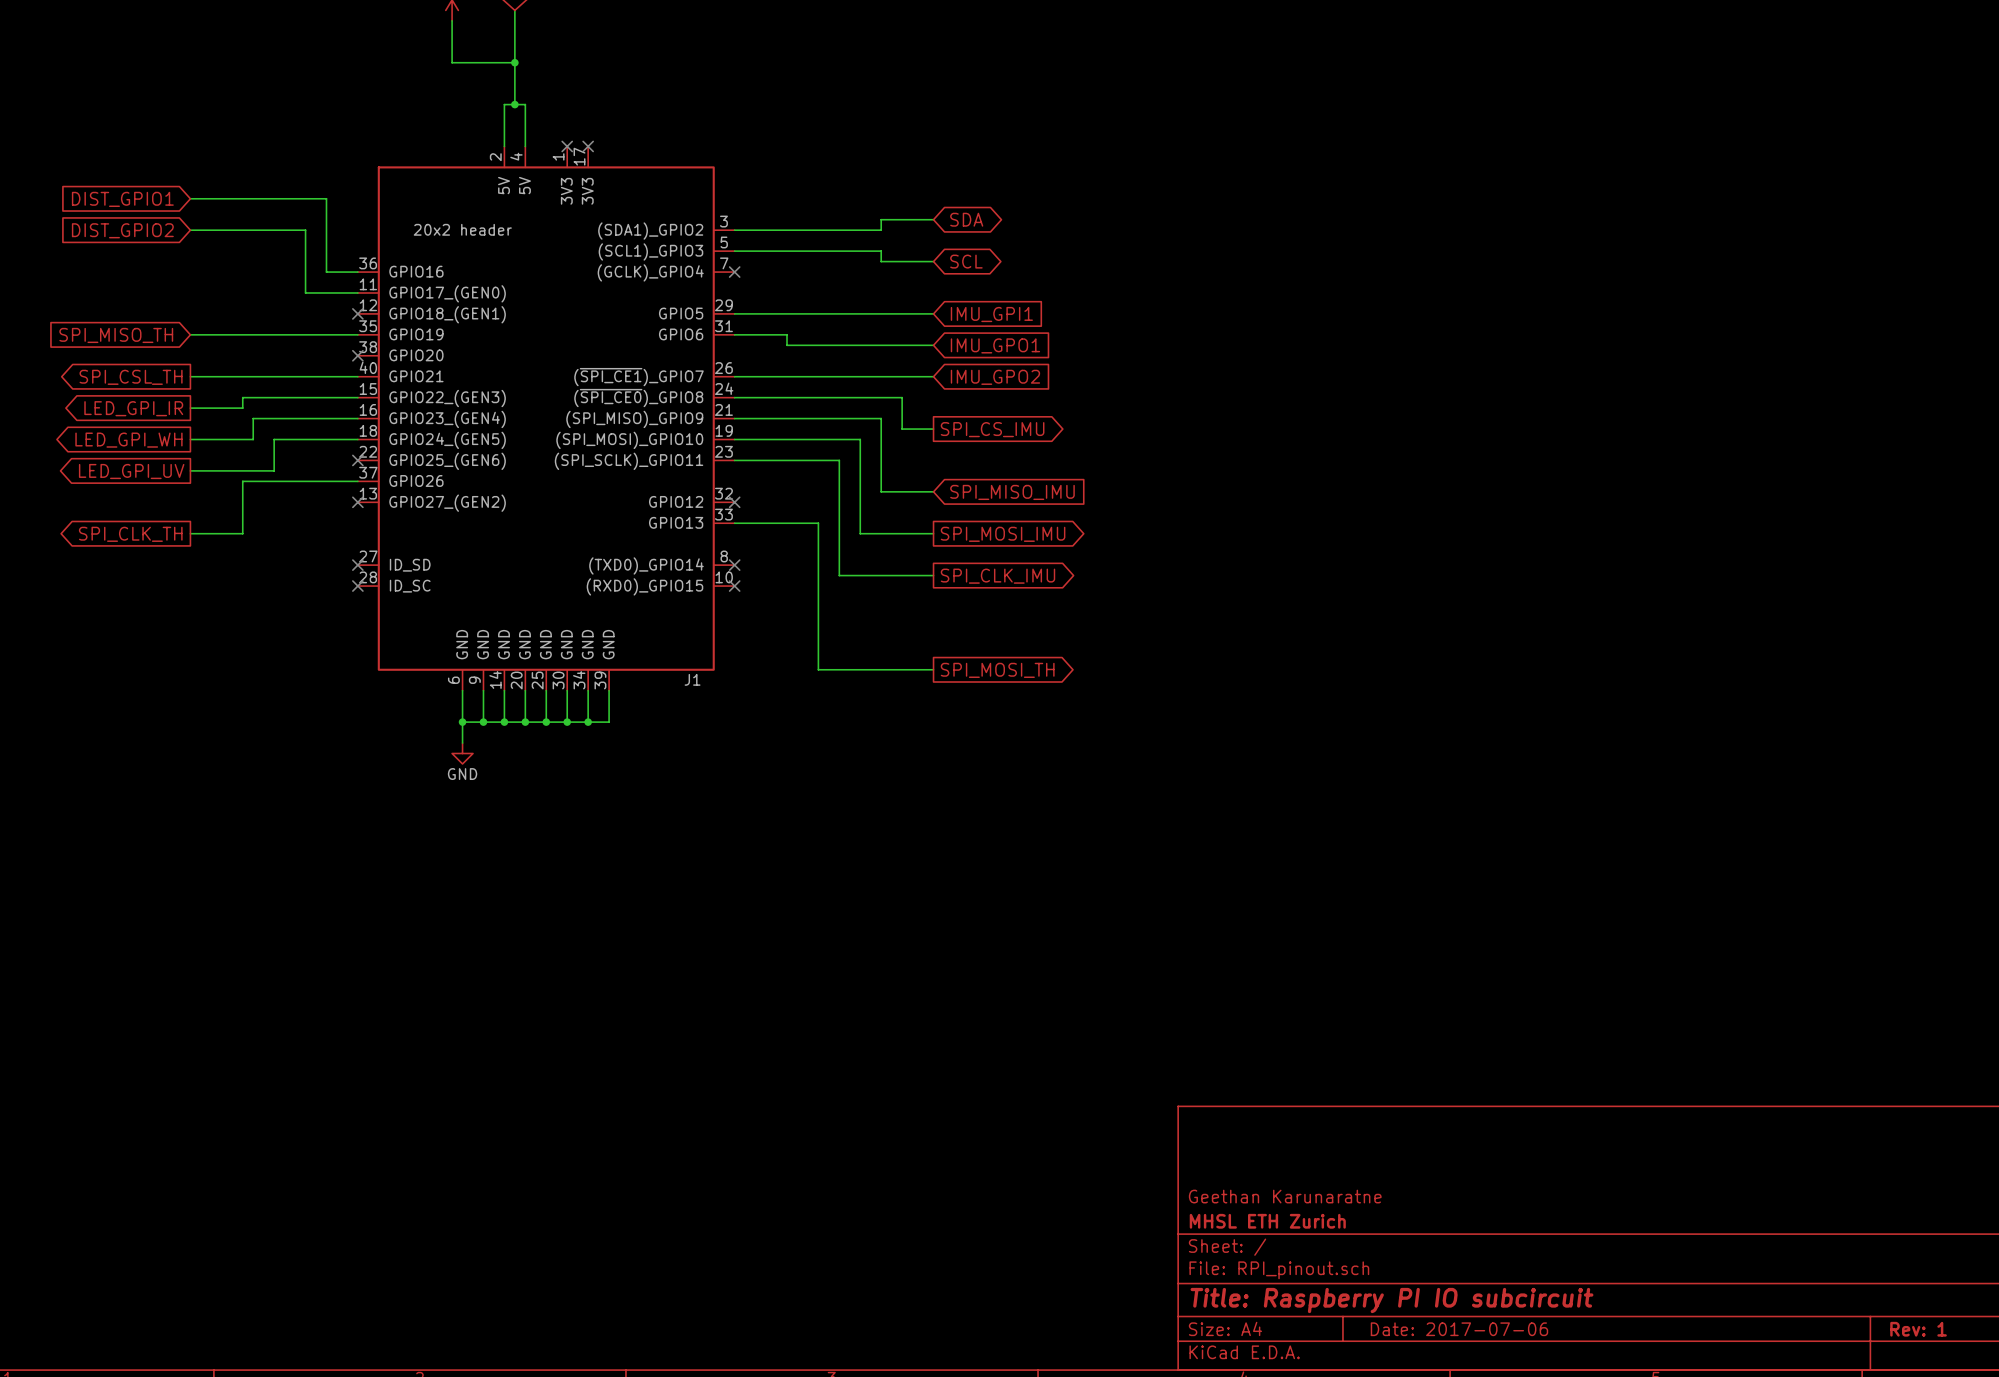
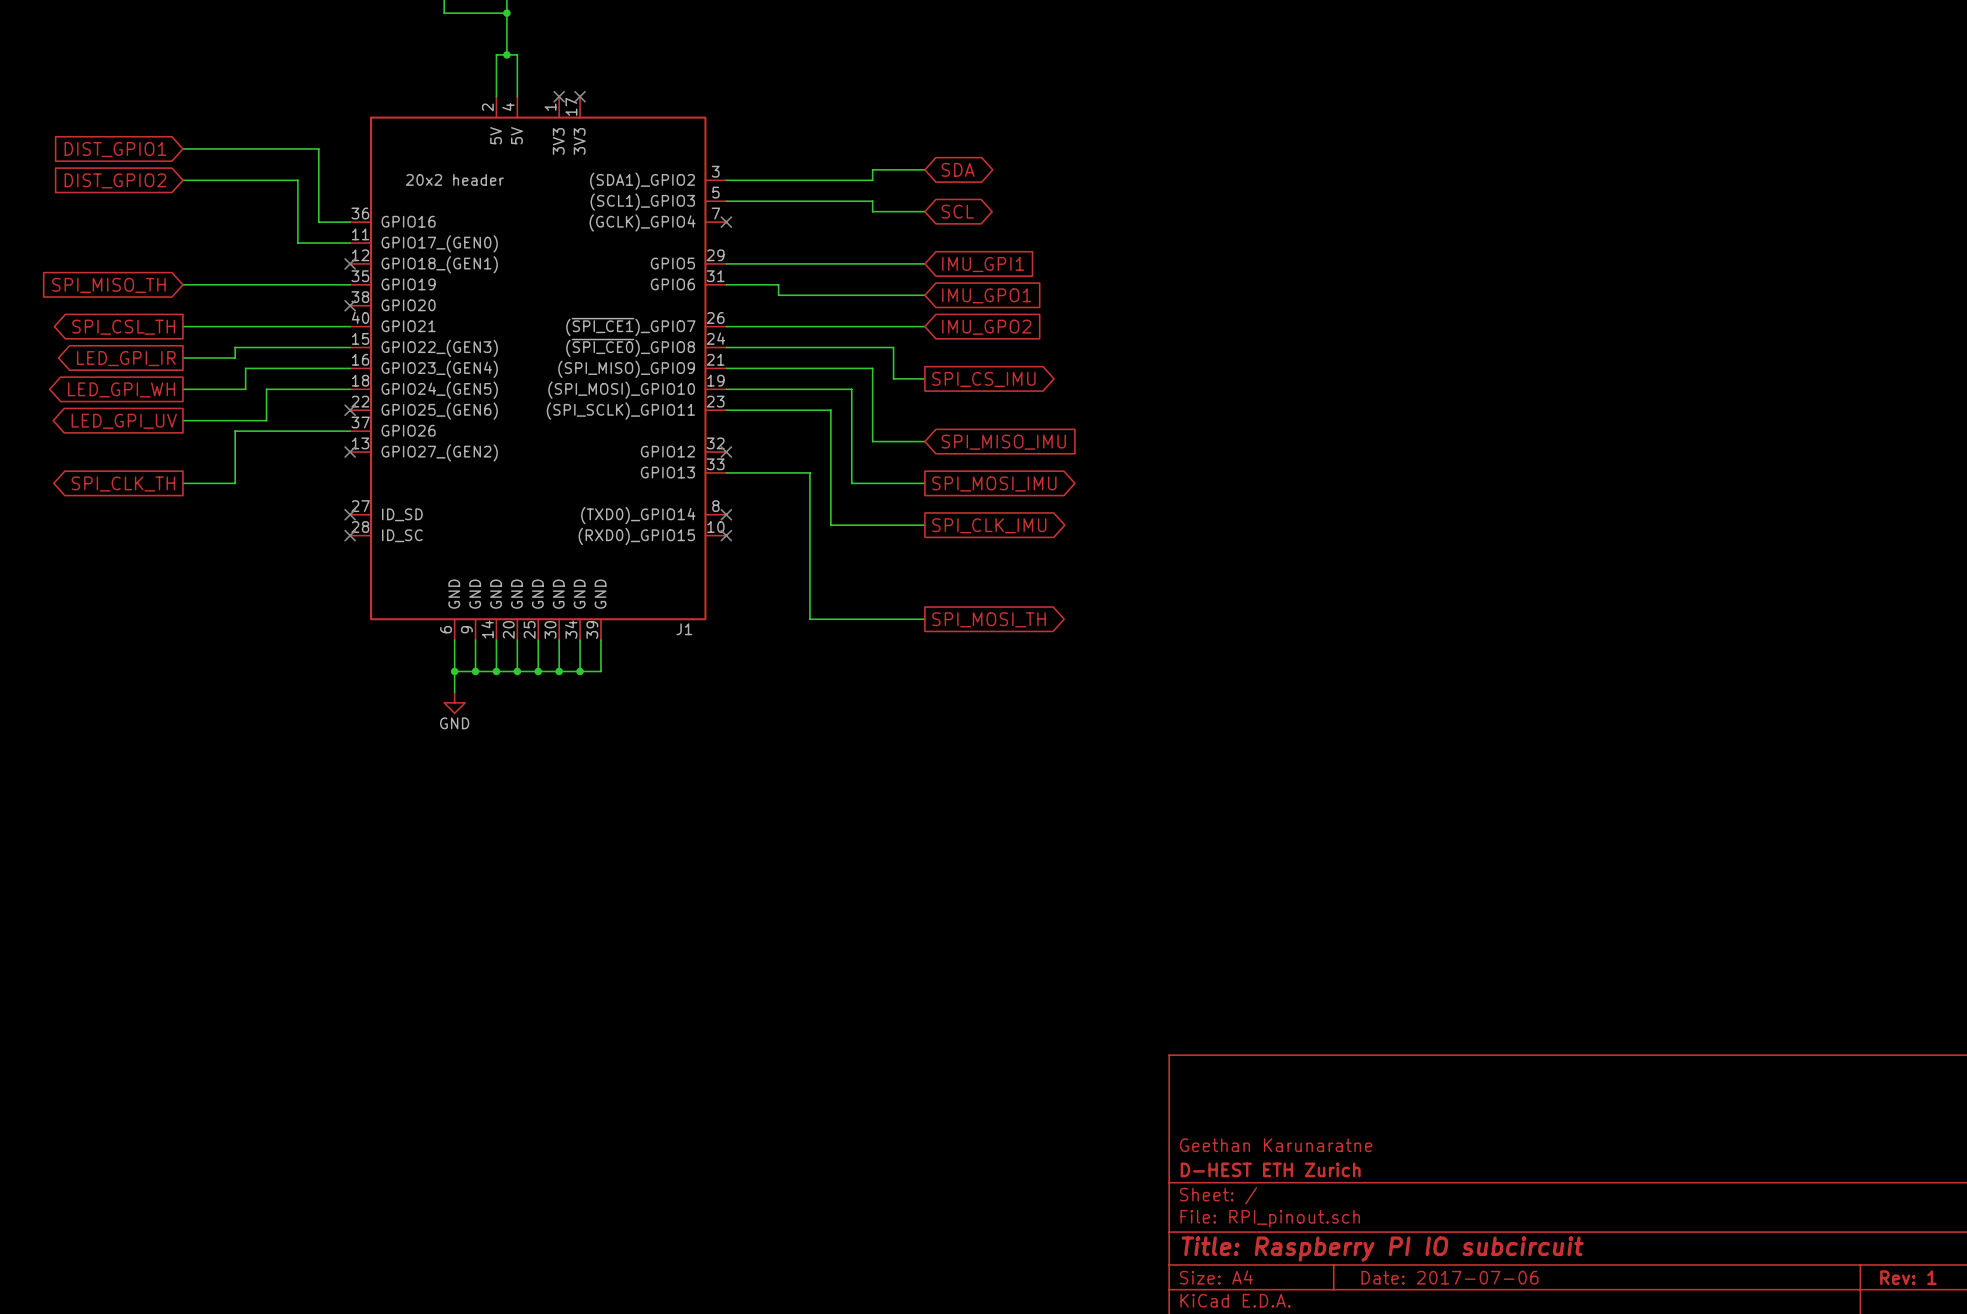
title block: MHSL ETH Zurich (1267, 1221) -> D-HEST ETH Zurich (1270, 1169)

